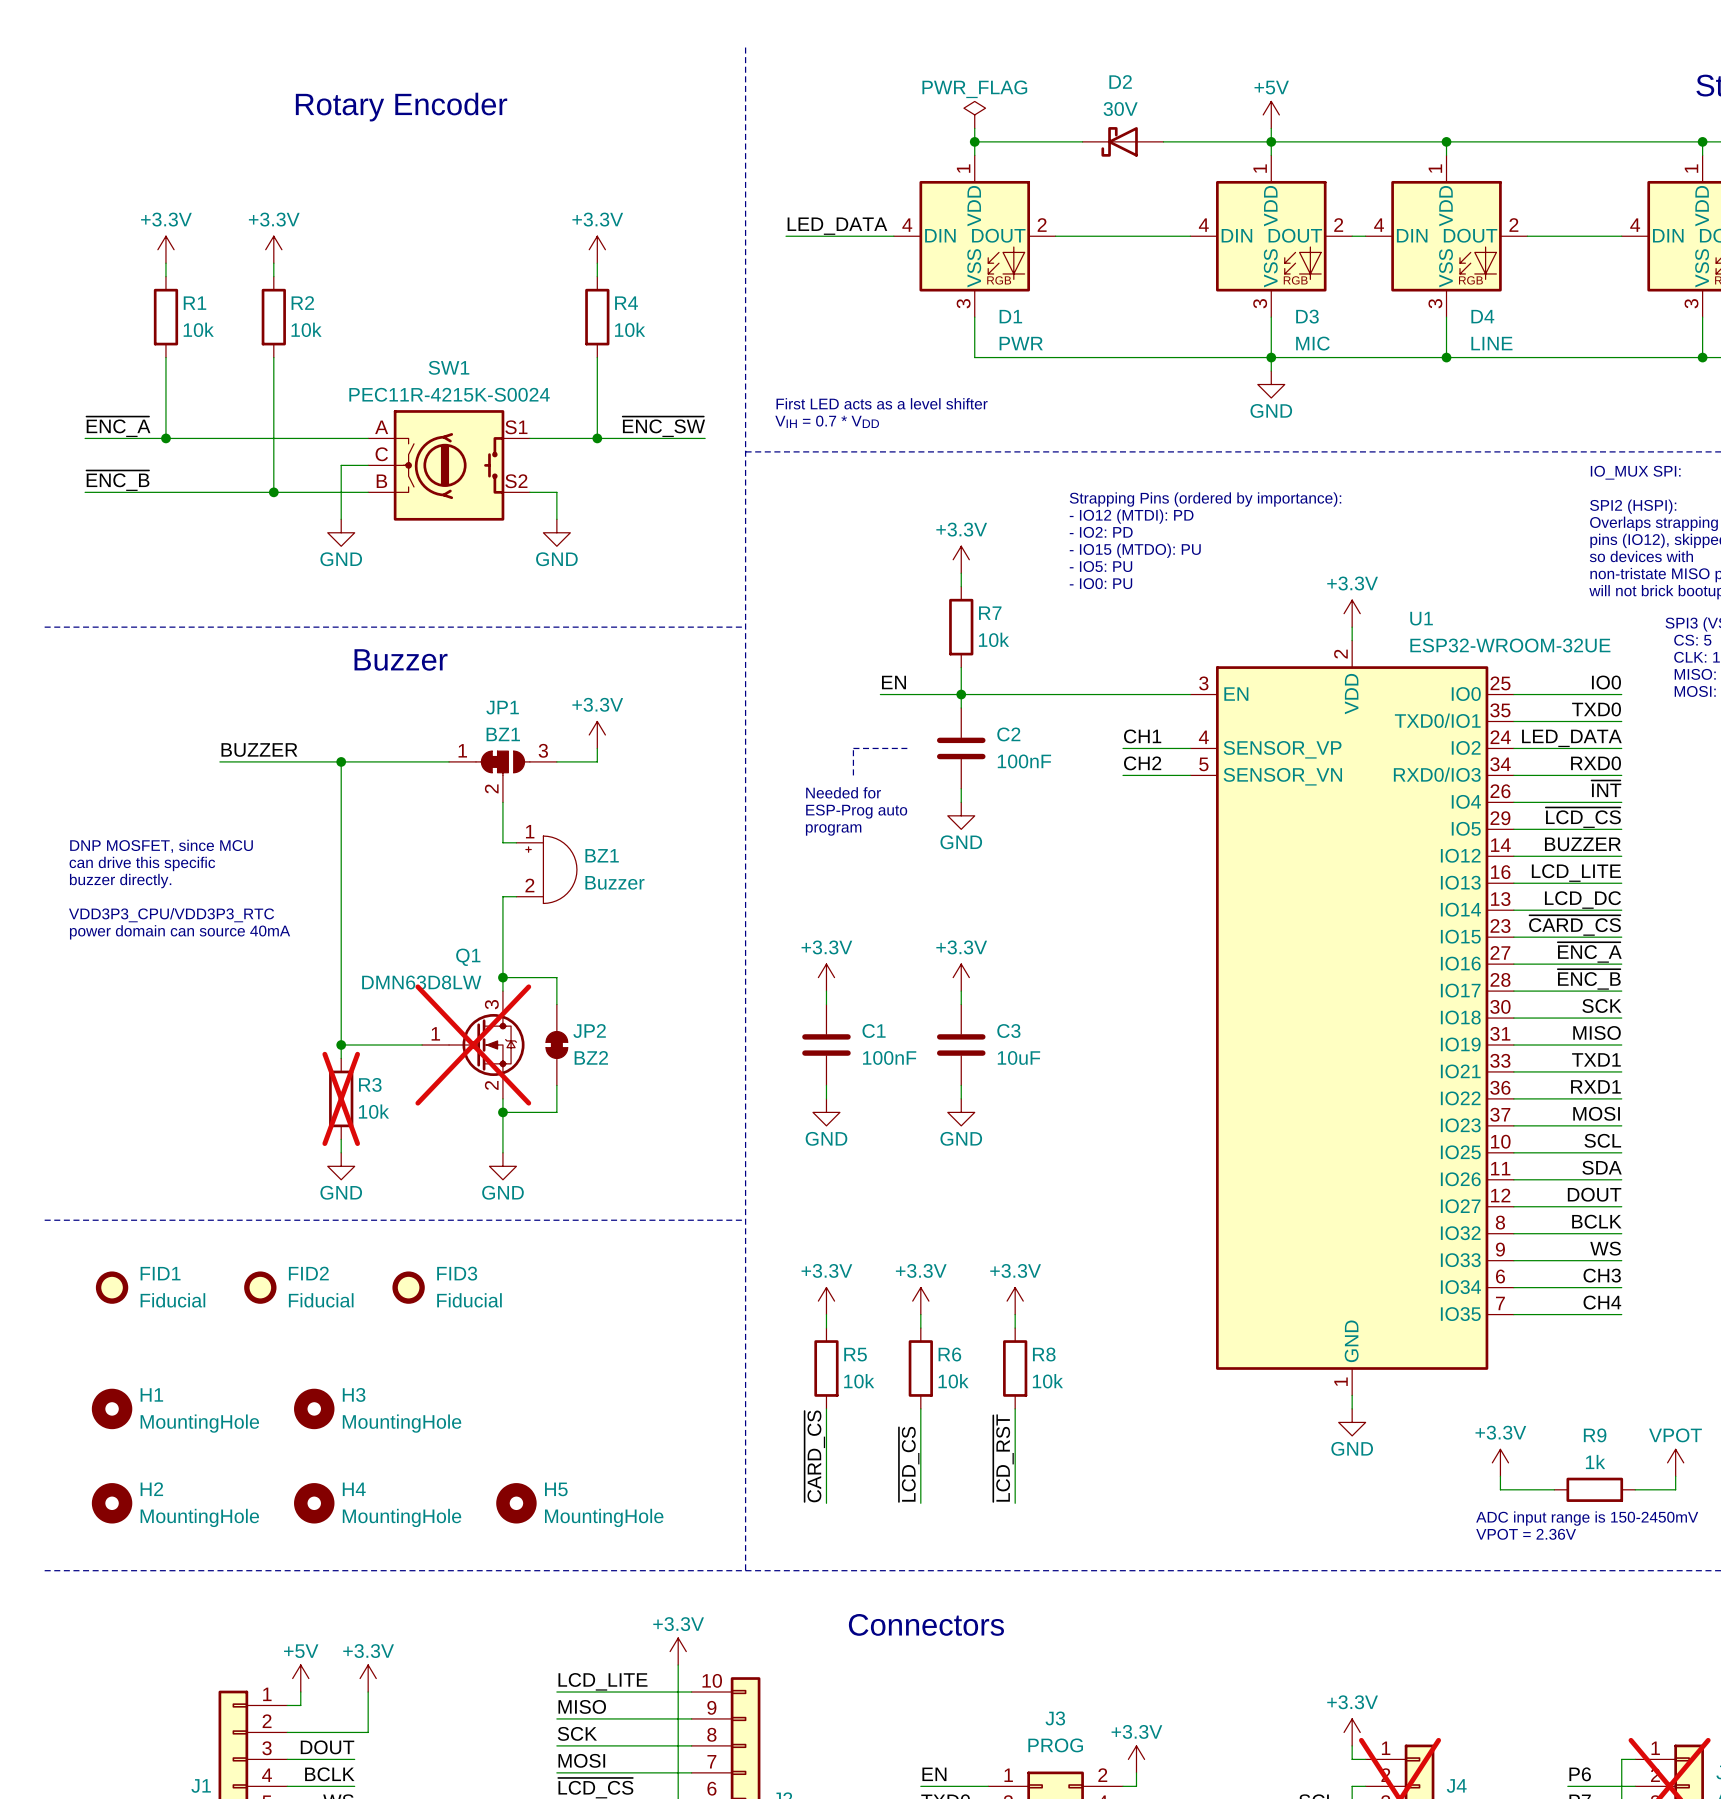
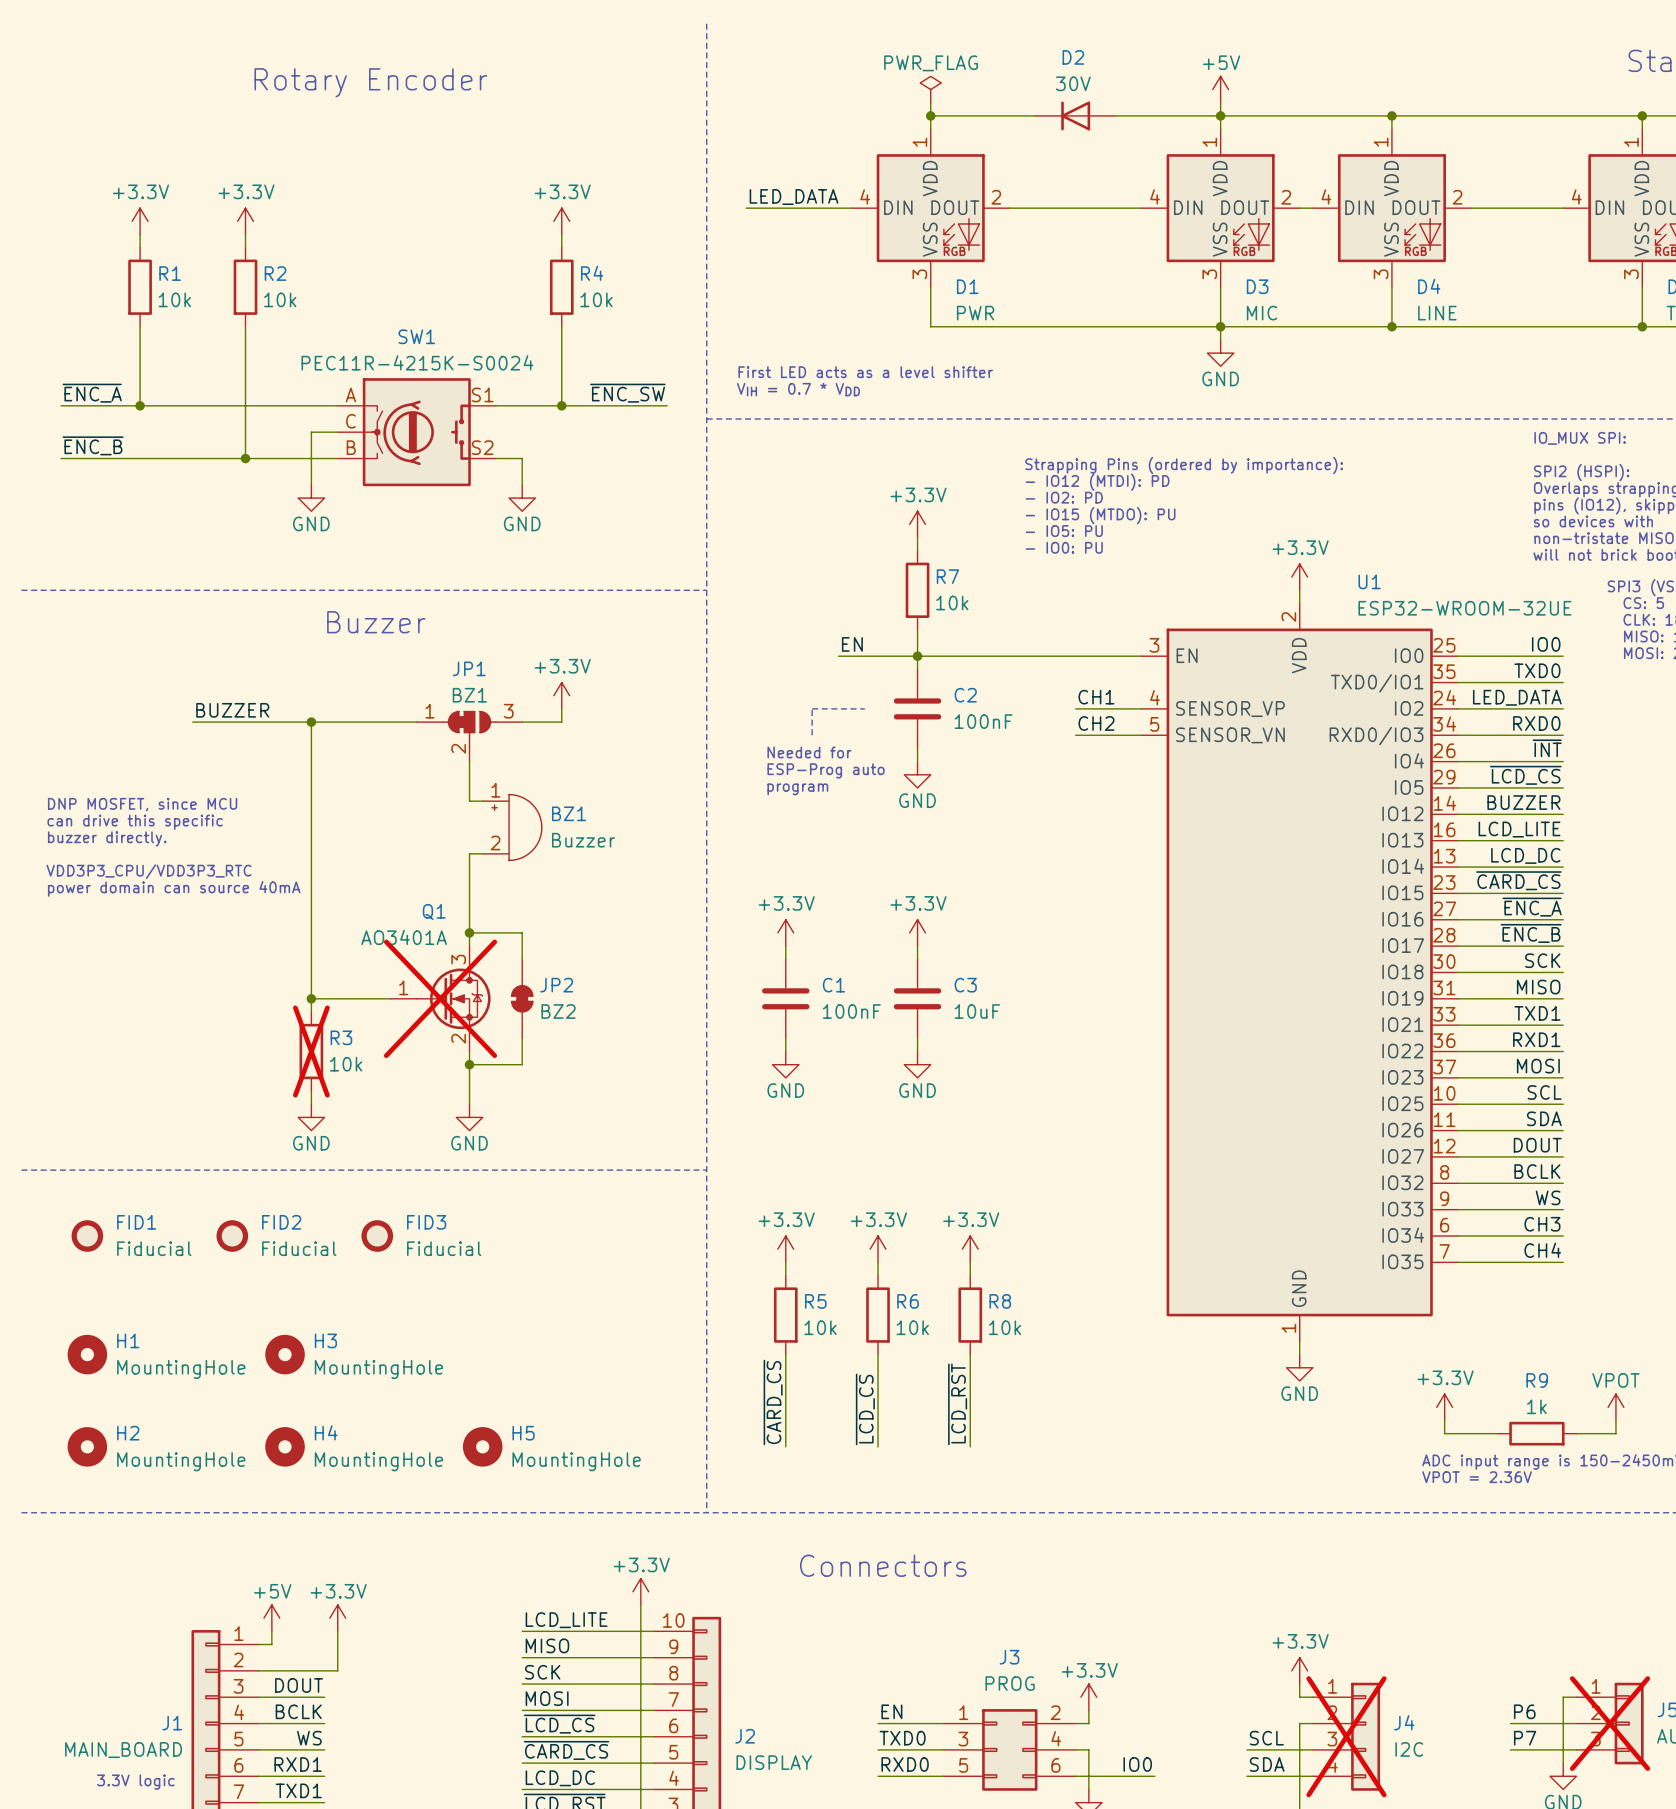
D2 symbol: [1082, 127, 1164, 157] -> [1036, 101, 1116, 131]
Q1 value: DMN63D8LW (421, 982) -> AO3401A (404, 937)

